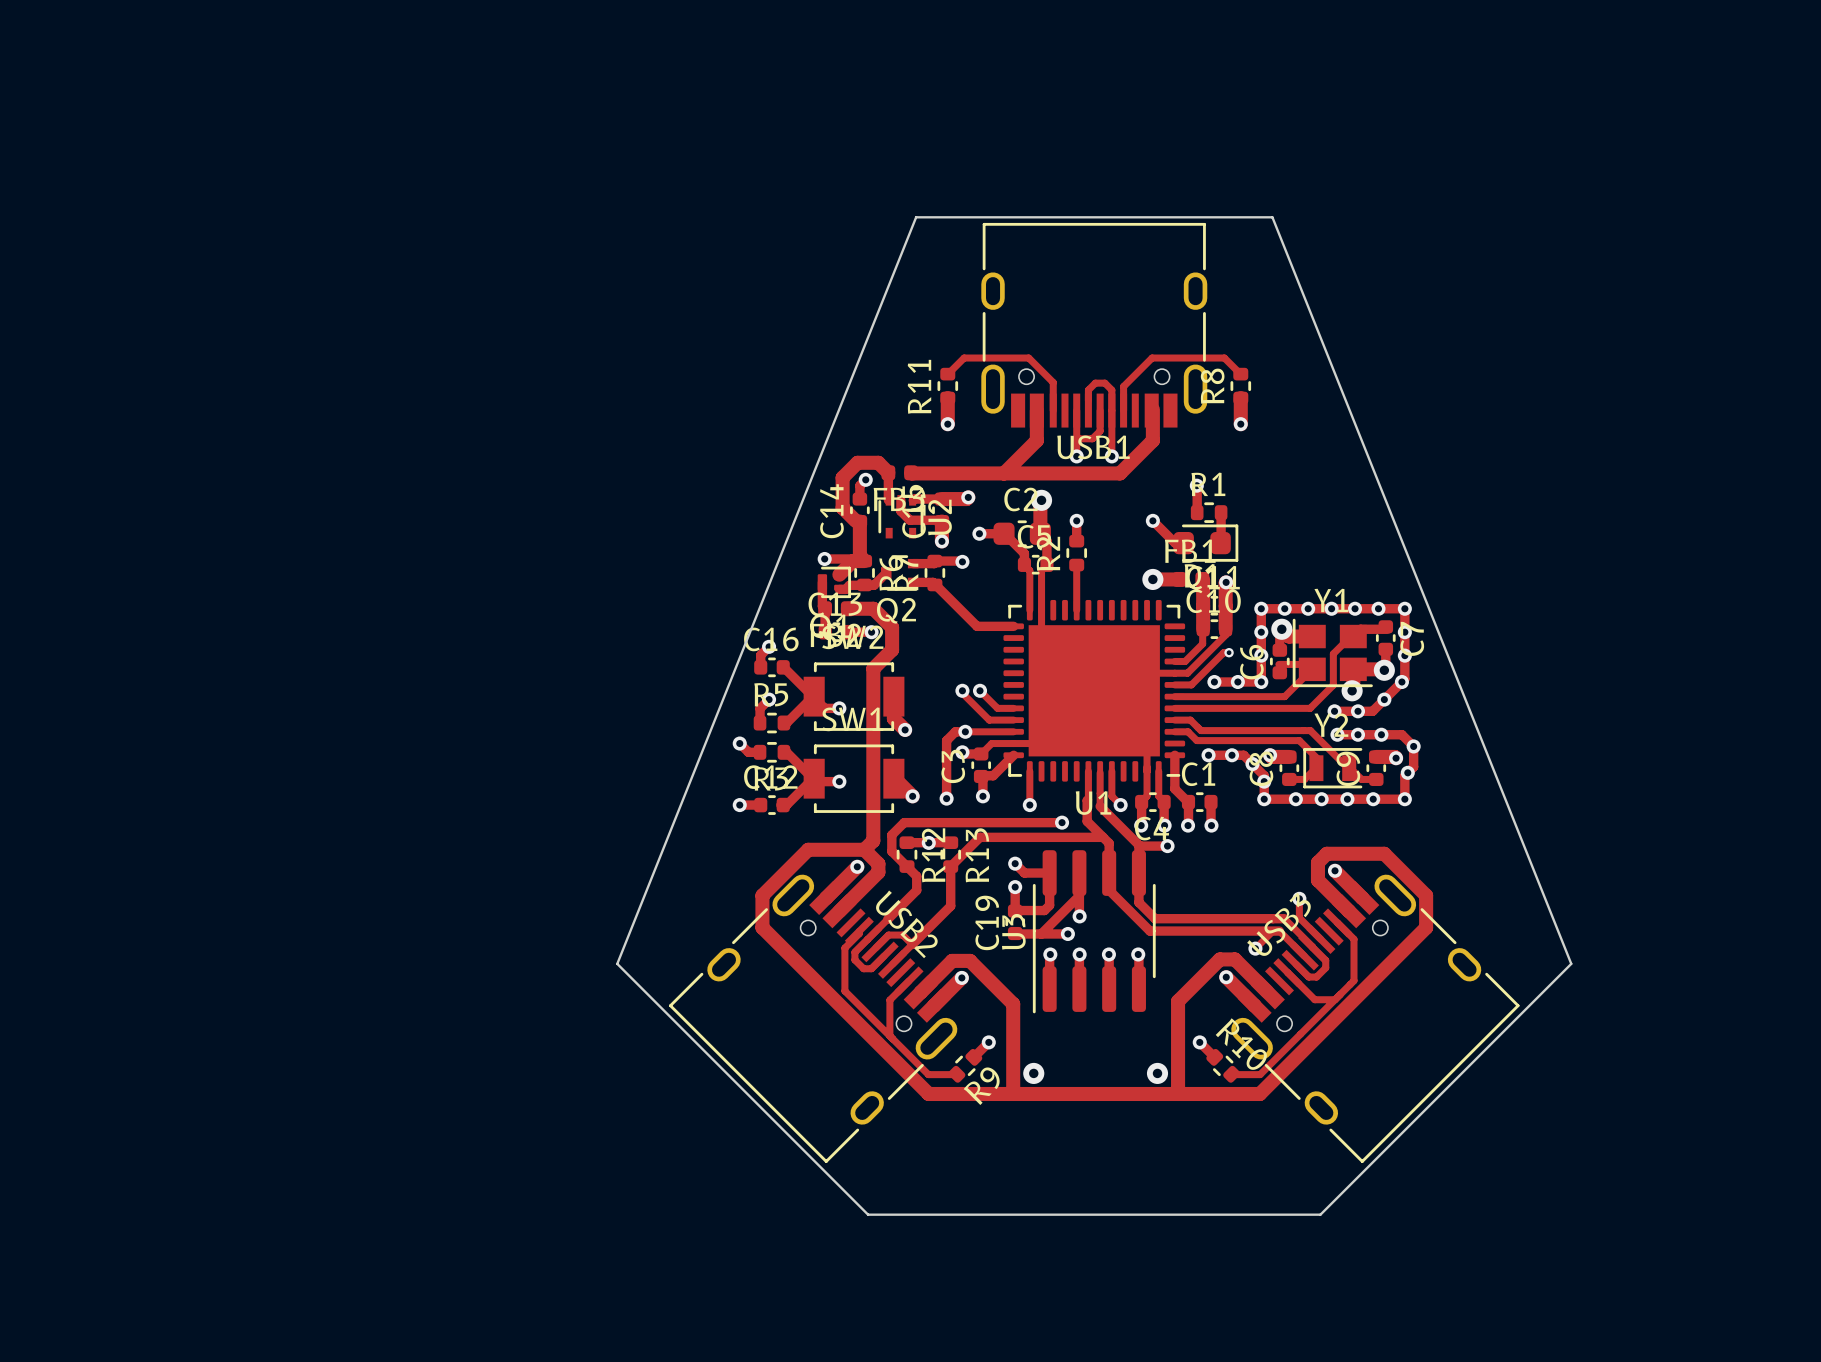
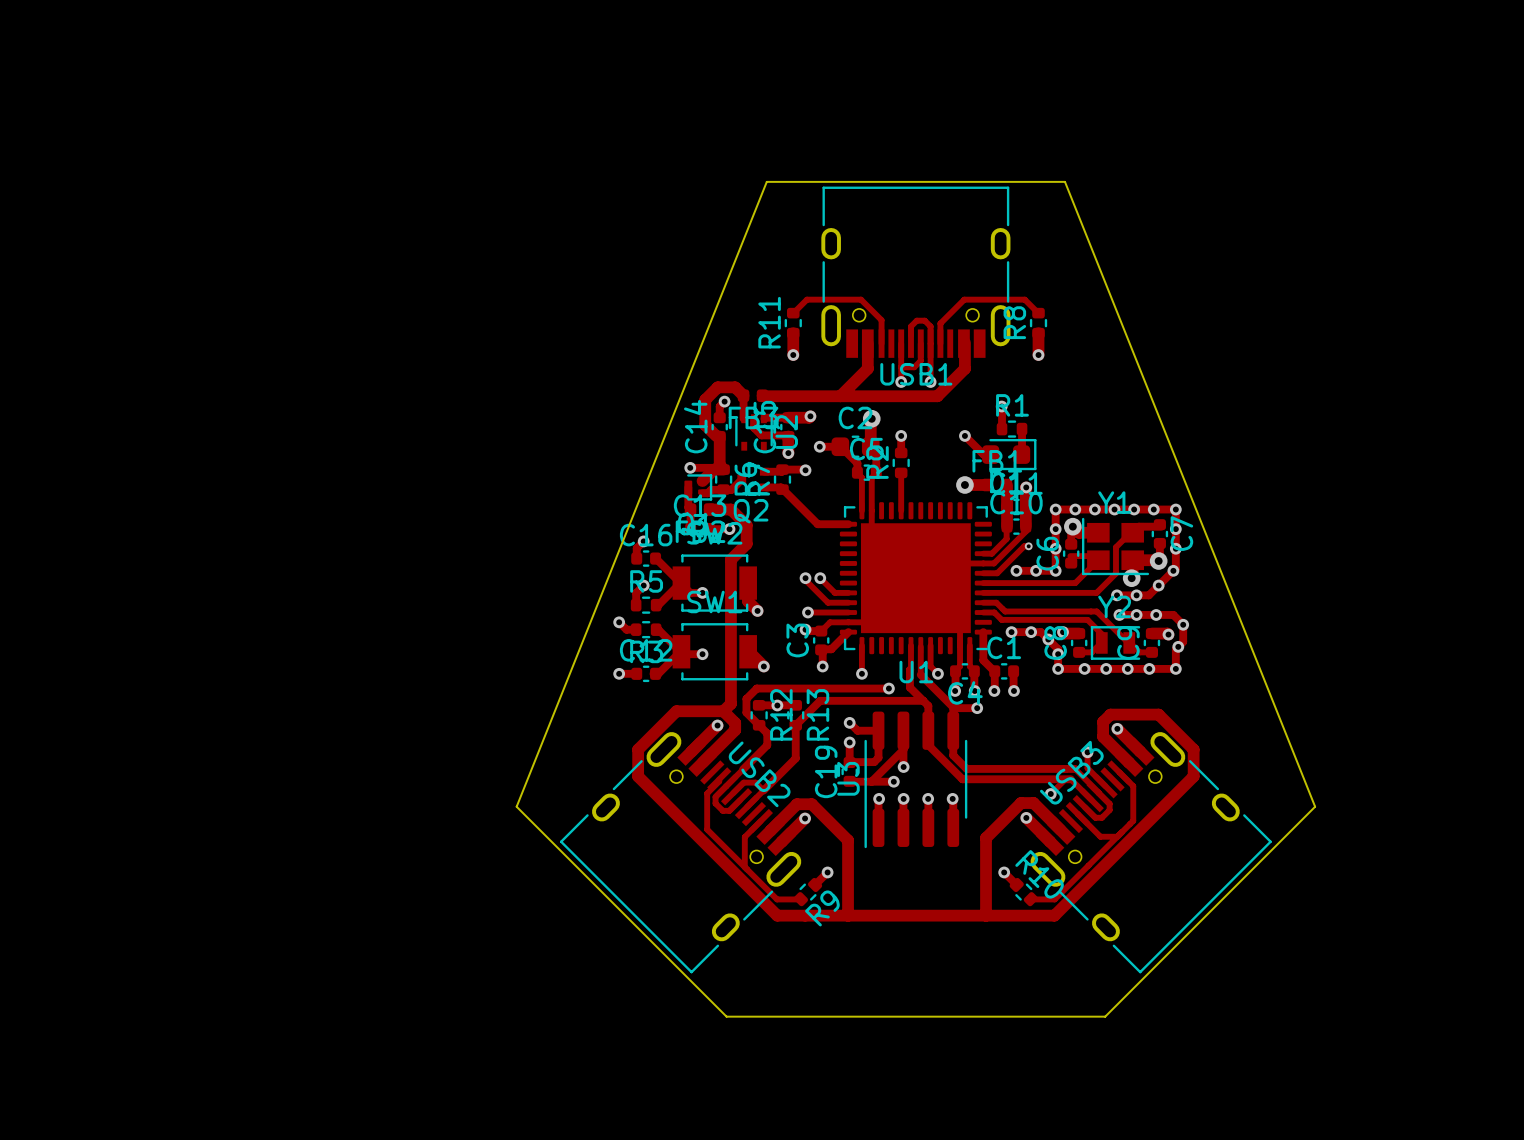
track: (965, 731) (955, 731) (946, 740) (946, 798) -> none
via: (946, 798) -> none
via: (1033, 1073) -> none
via: (1157, 1073) -> none

